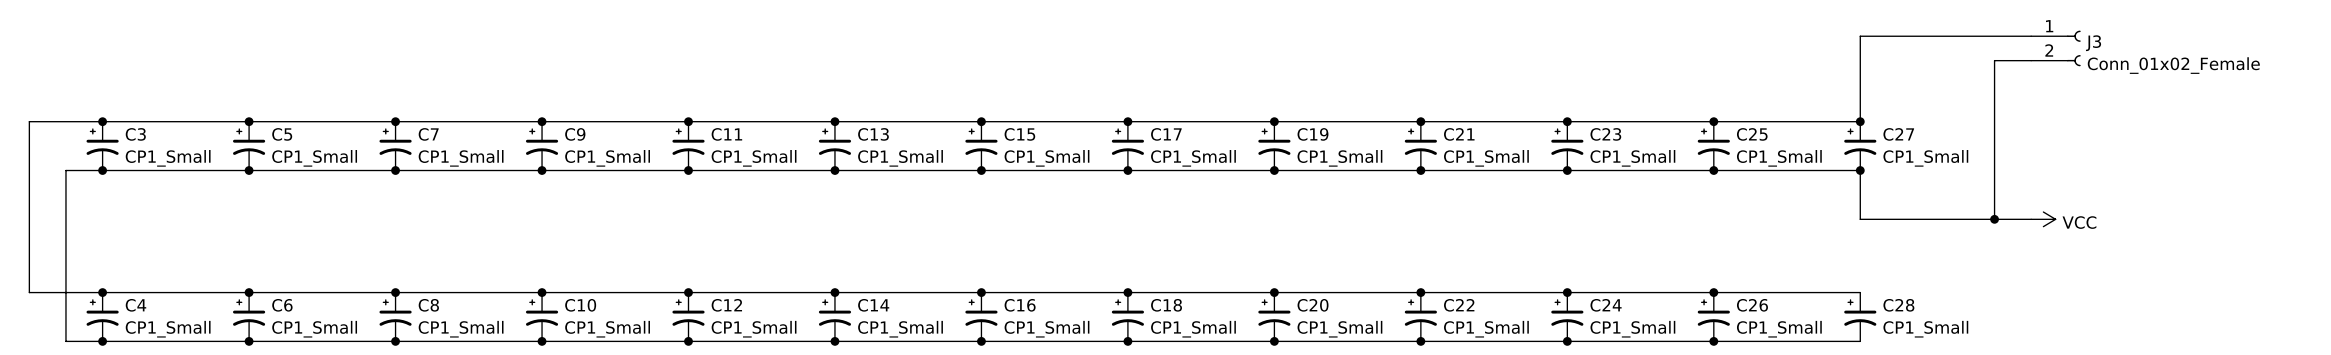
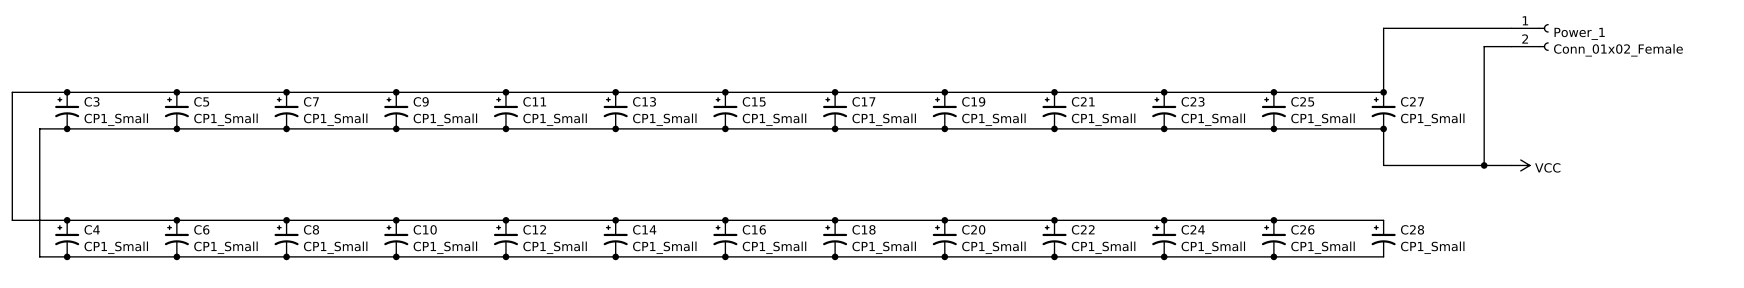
J3 name: J3 (2093, 43) -> Power_1 (1579, 33)

